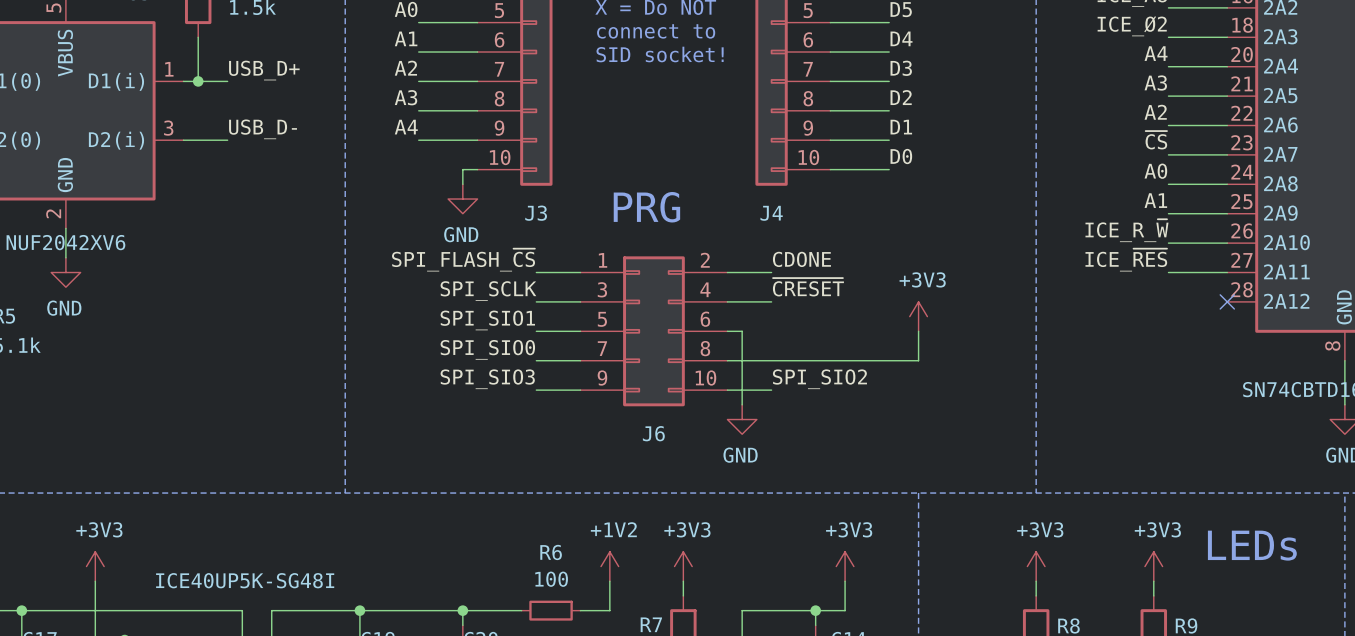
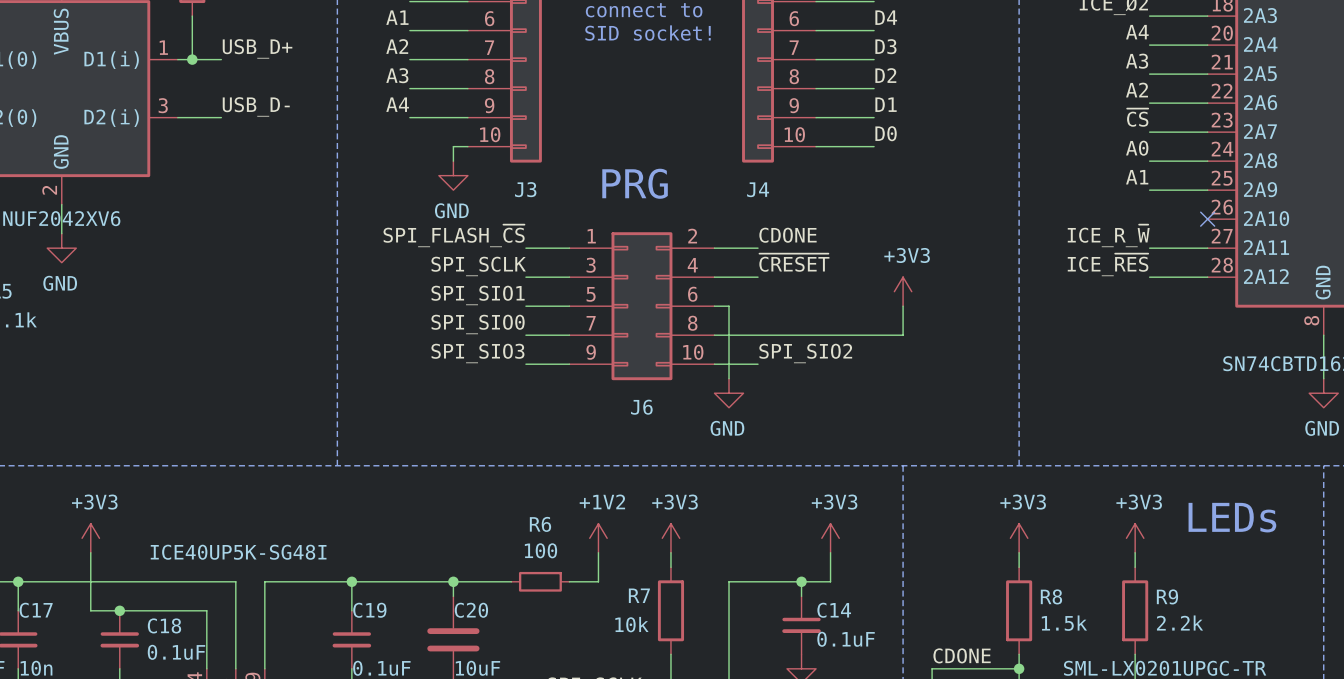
label: ICE_R_~{W} (1126, 230) -> none
wire: (1168, 243) (1227, 243) -> (1149, 277) (1207, 277)
label: ICE_~{RES} (1126, 260) -> ICE_R_~{W} (1108, 235)
label: none -> ICE_~{RES} (1108, 264)
no-connect mark position: (1227, 301) -> (1207, 219)

